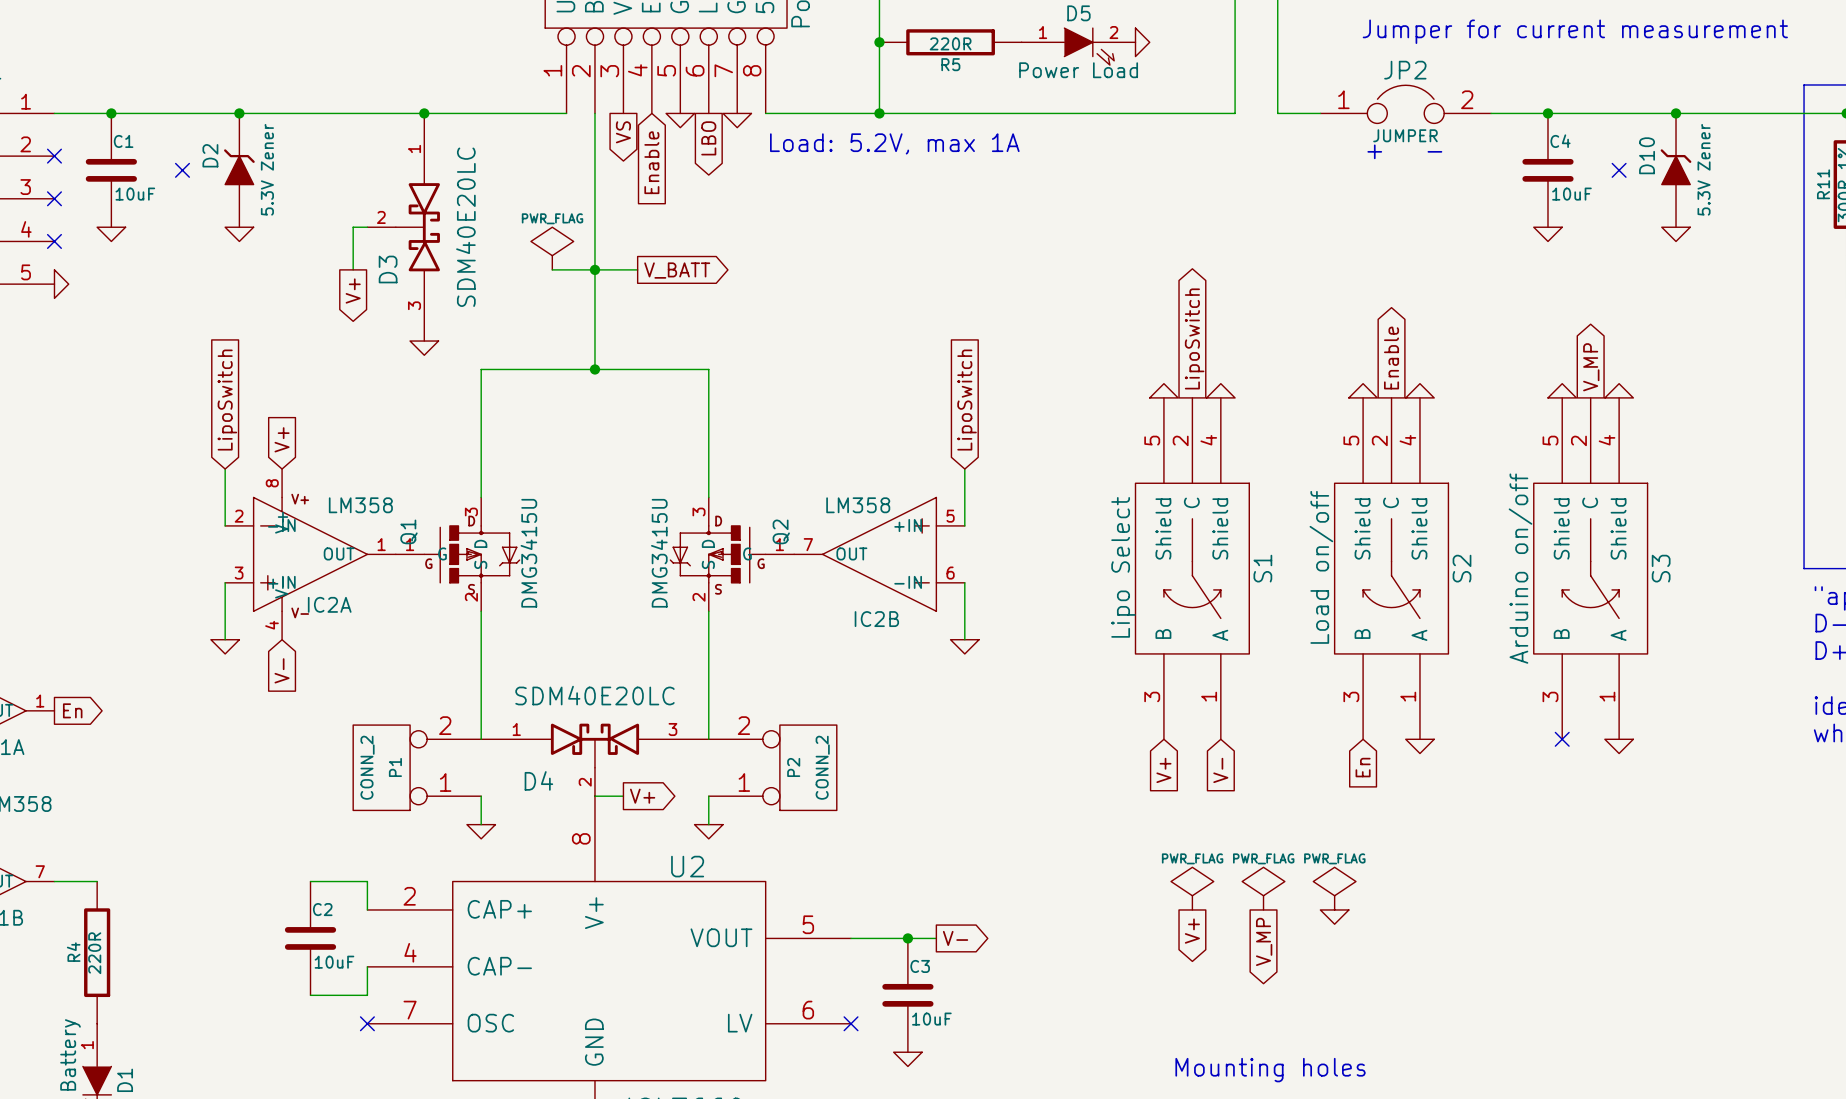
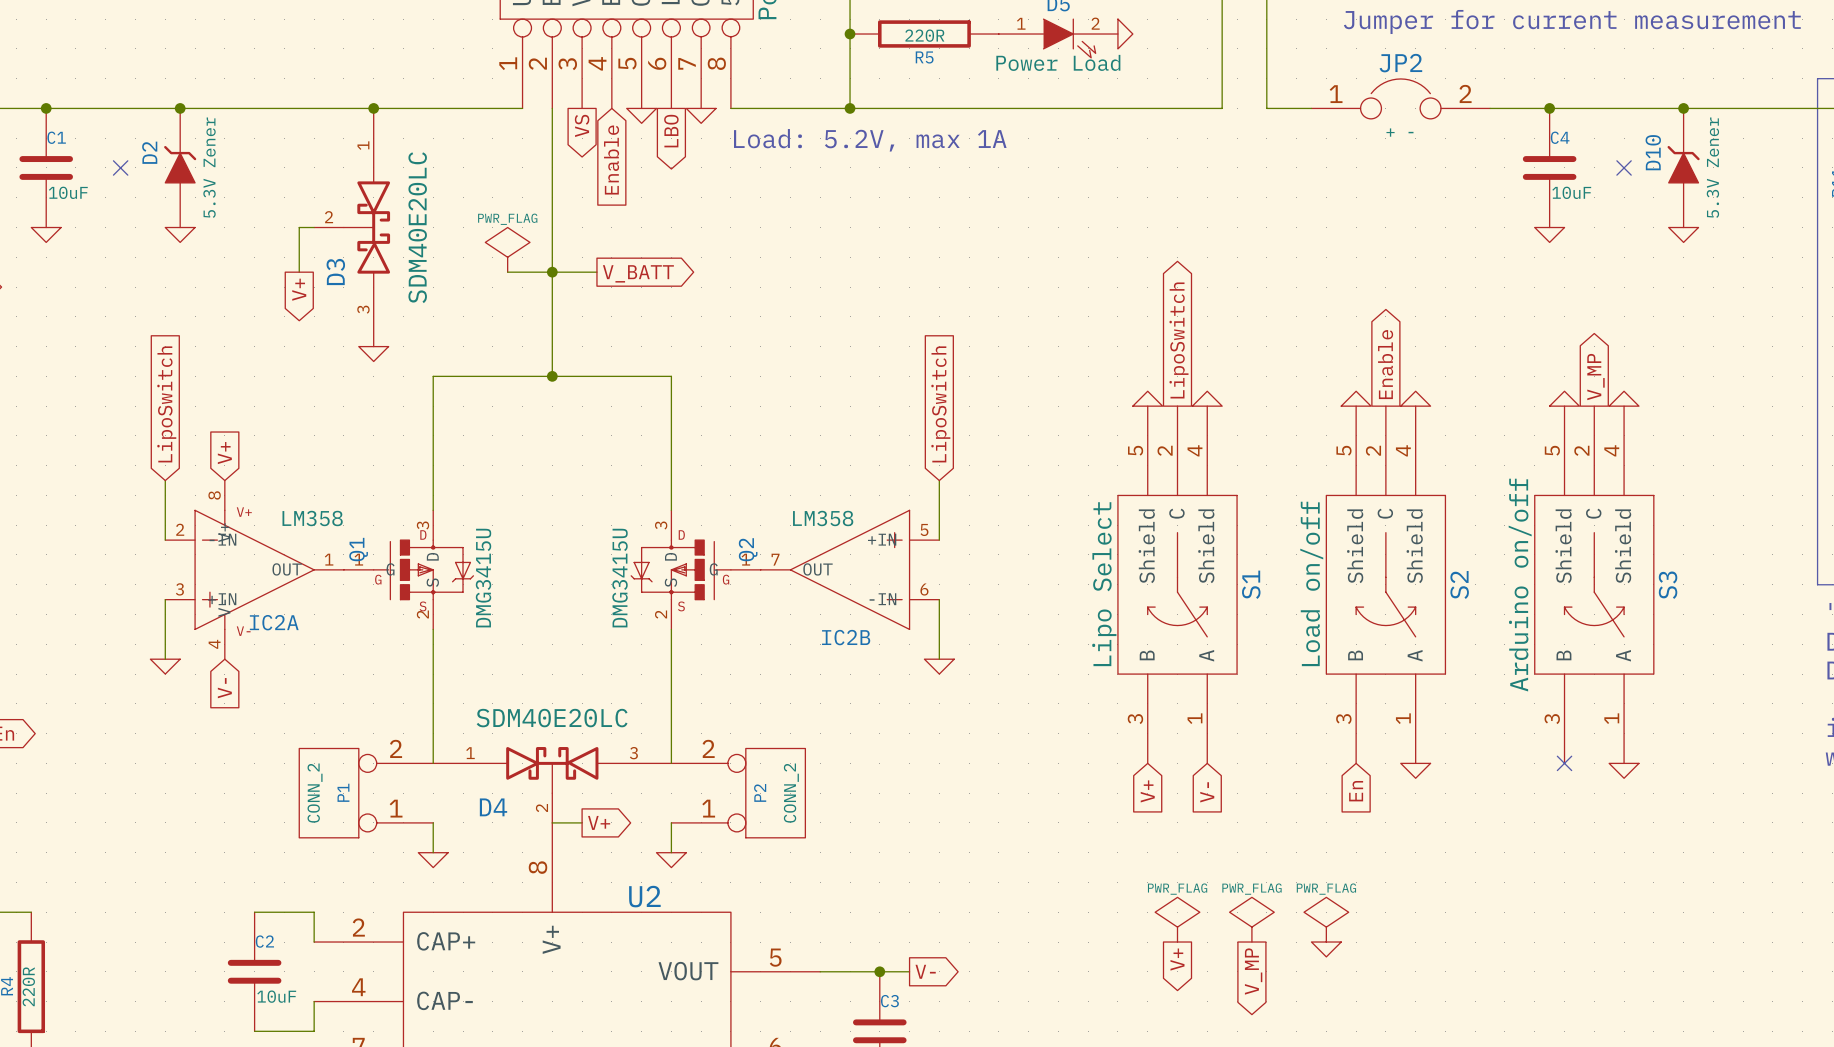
JP2 value: JUMPER (1405, 135) -> + - (1399, 132)
text: + - (1404, 151) -> none

